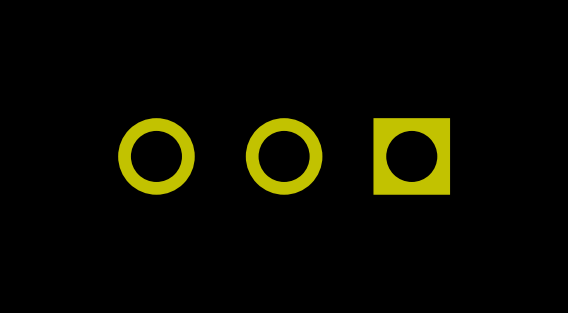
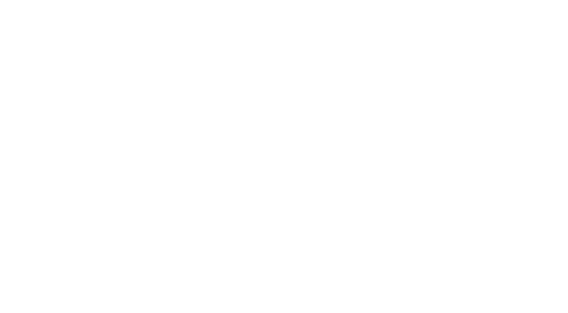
part: (284, 156) -> none

